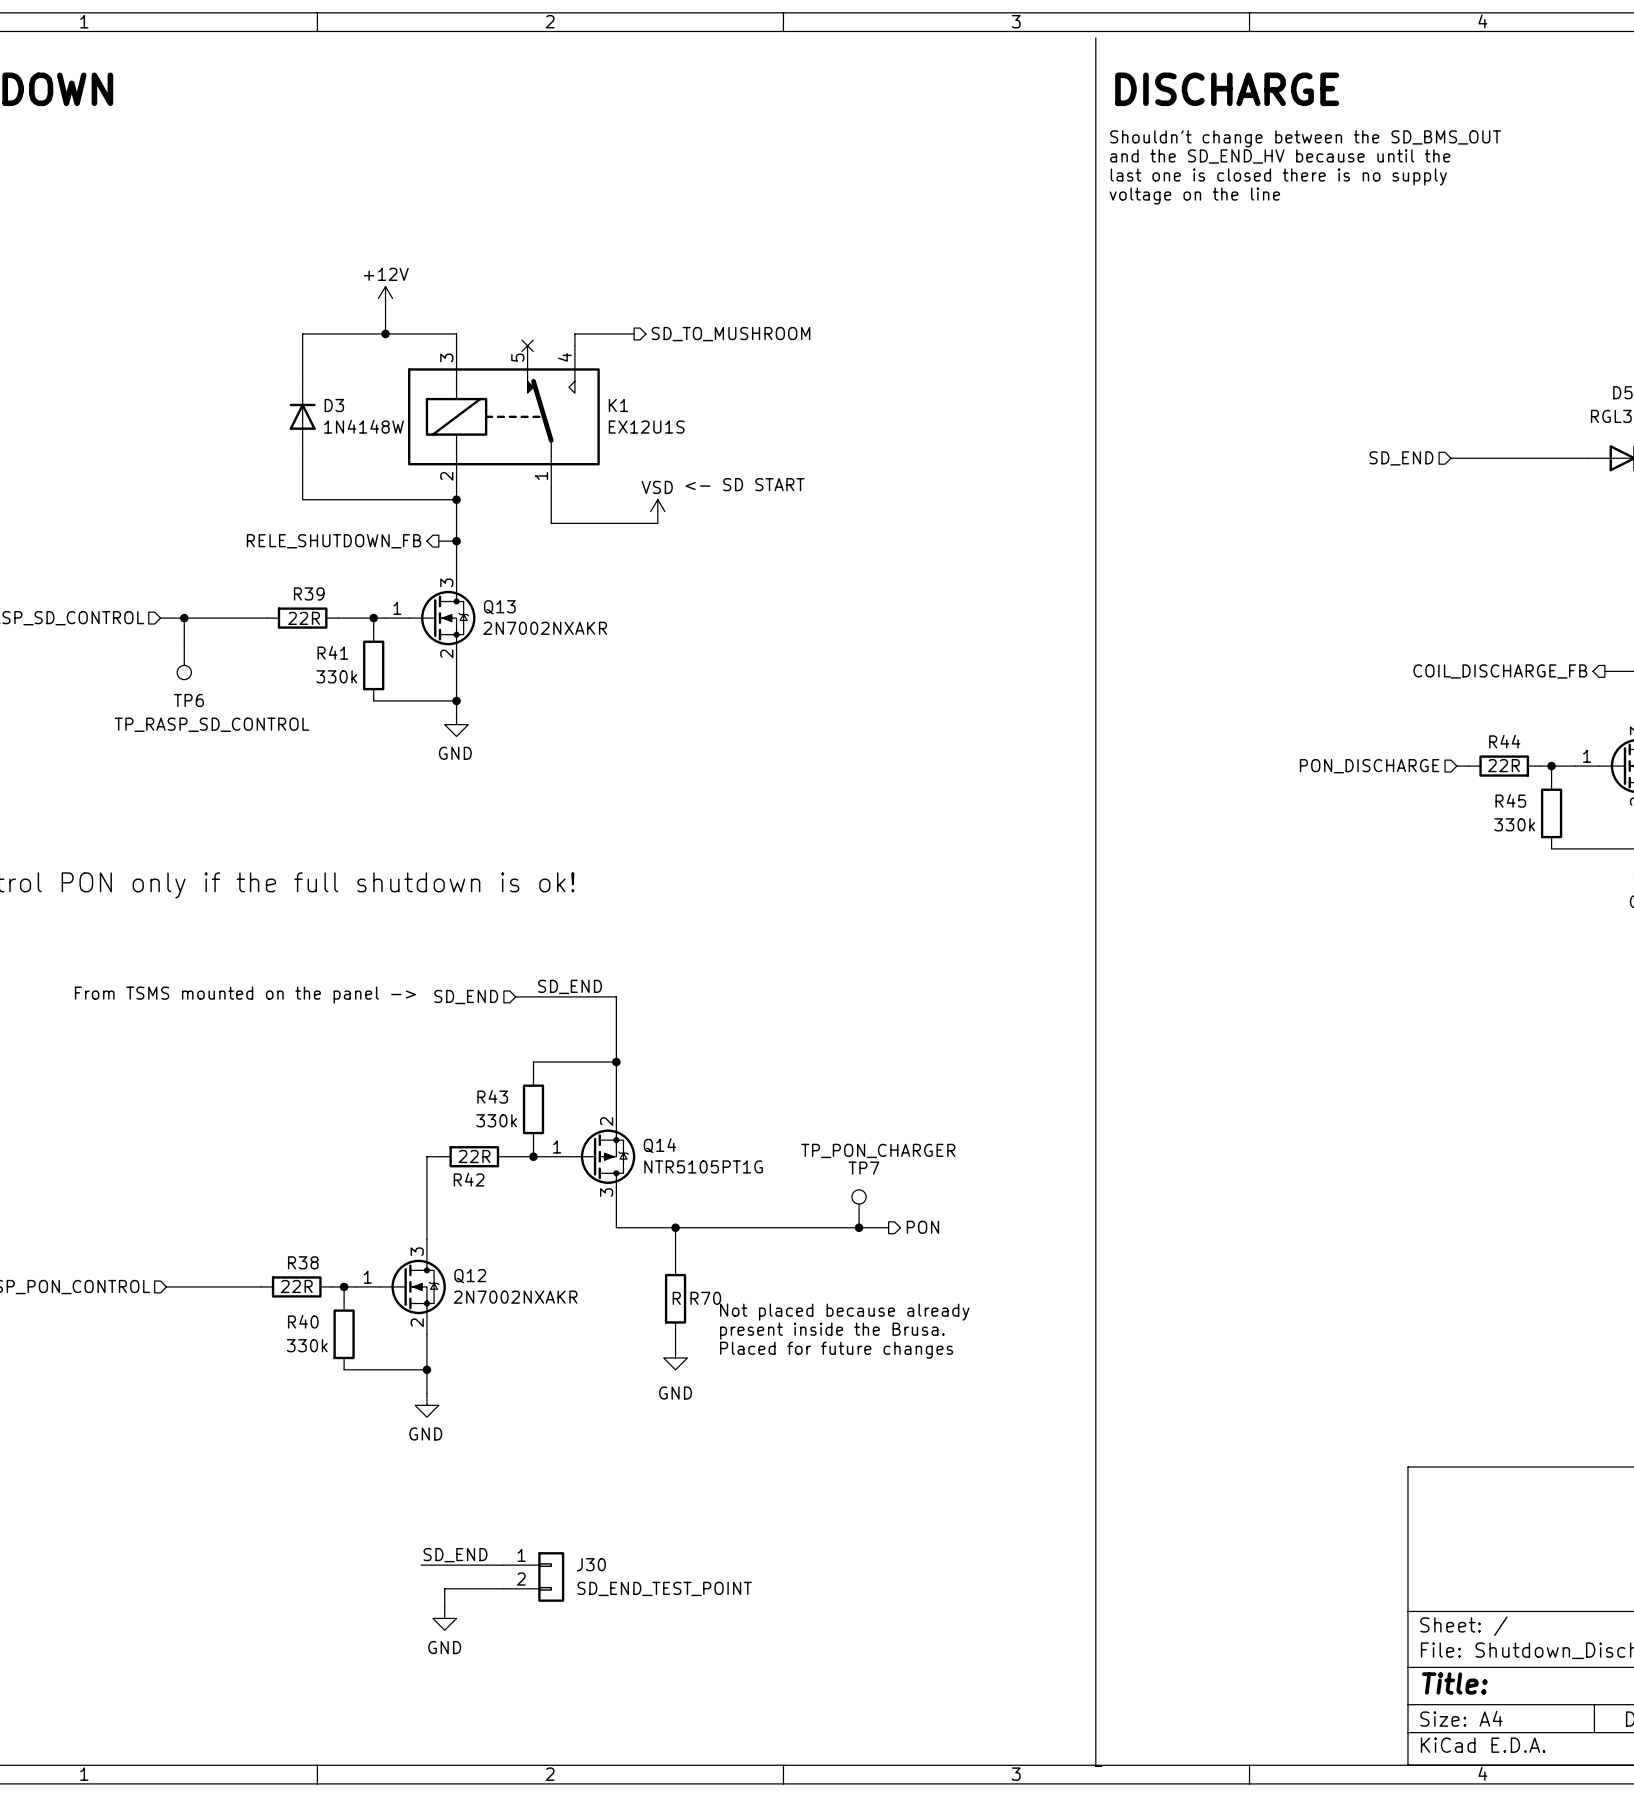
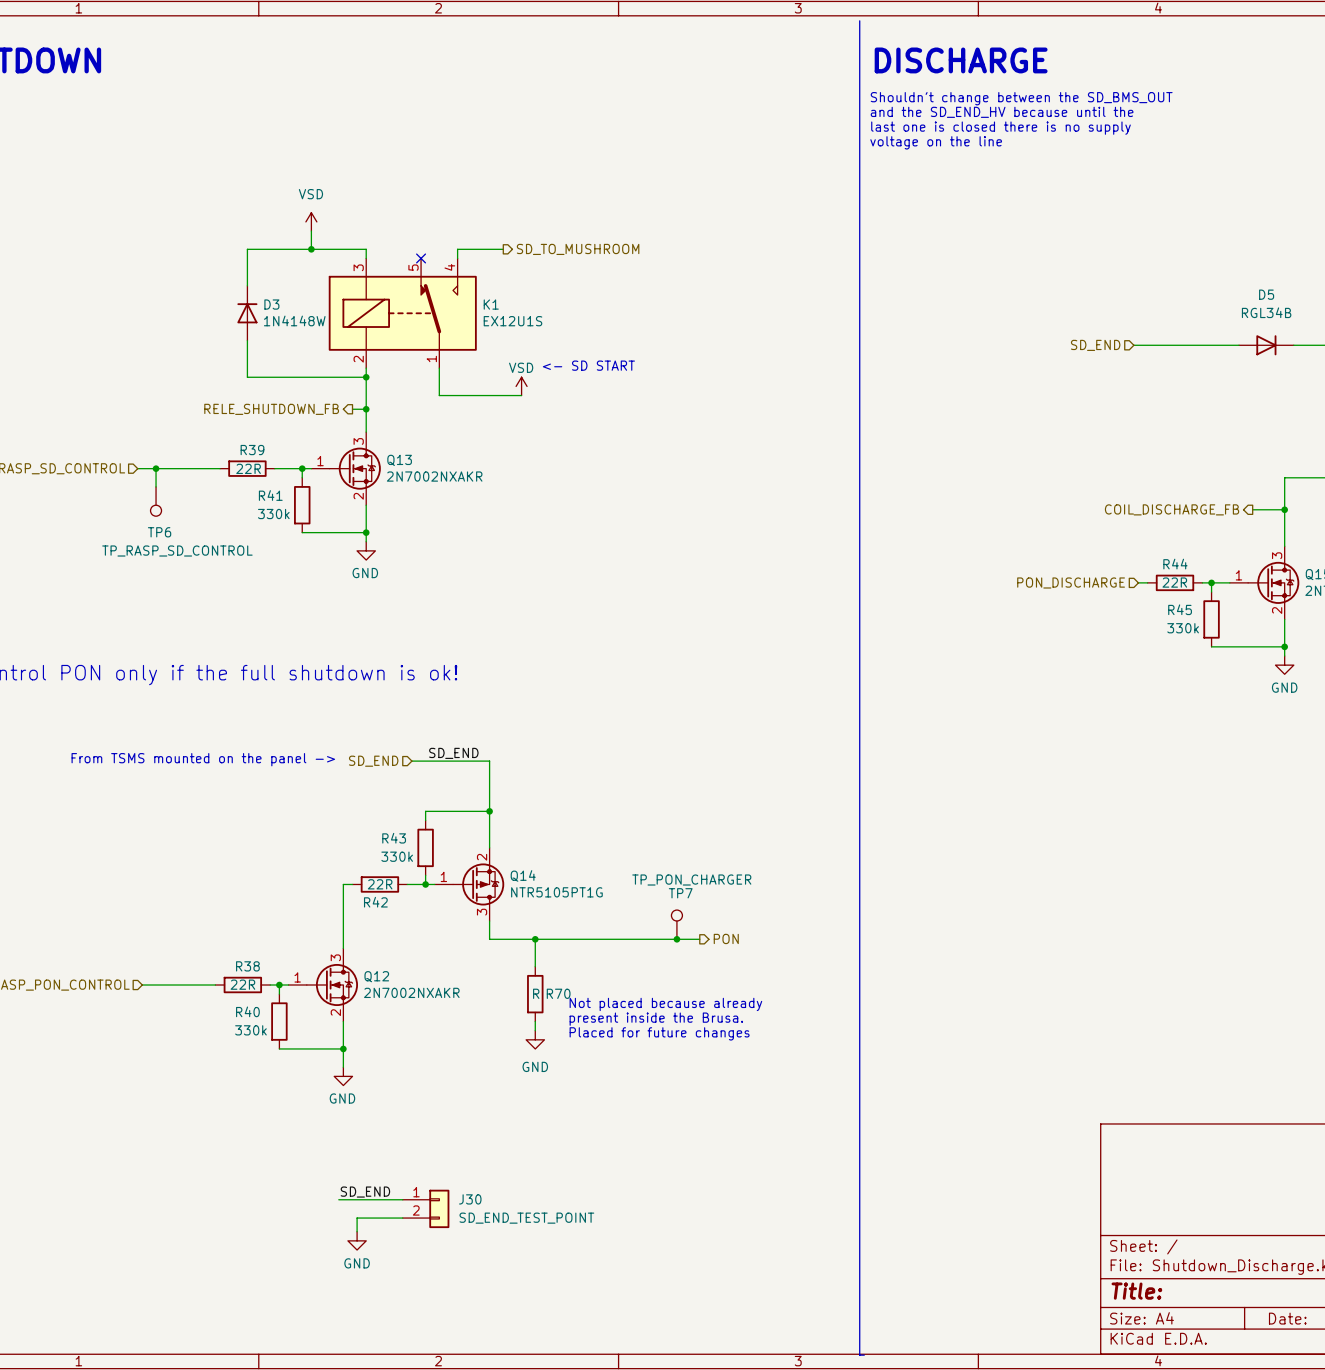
power symbol: +12V (385, 298) -> VSD (311, 221)

